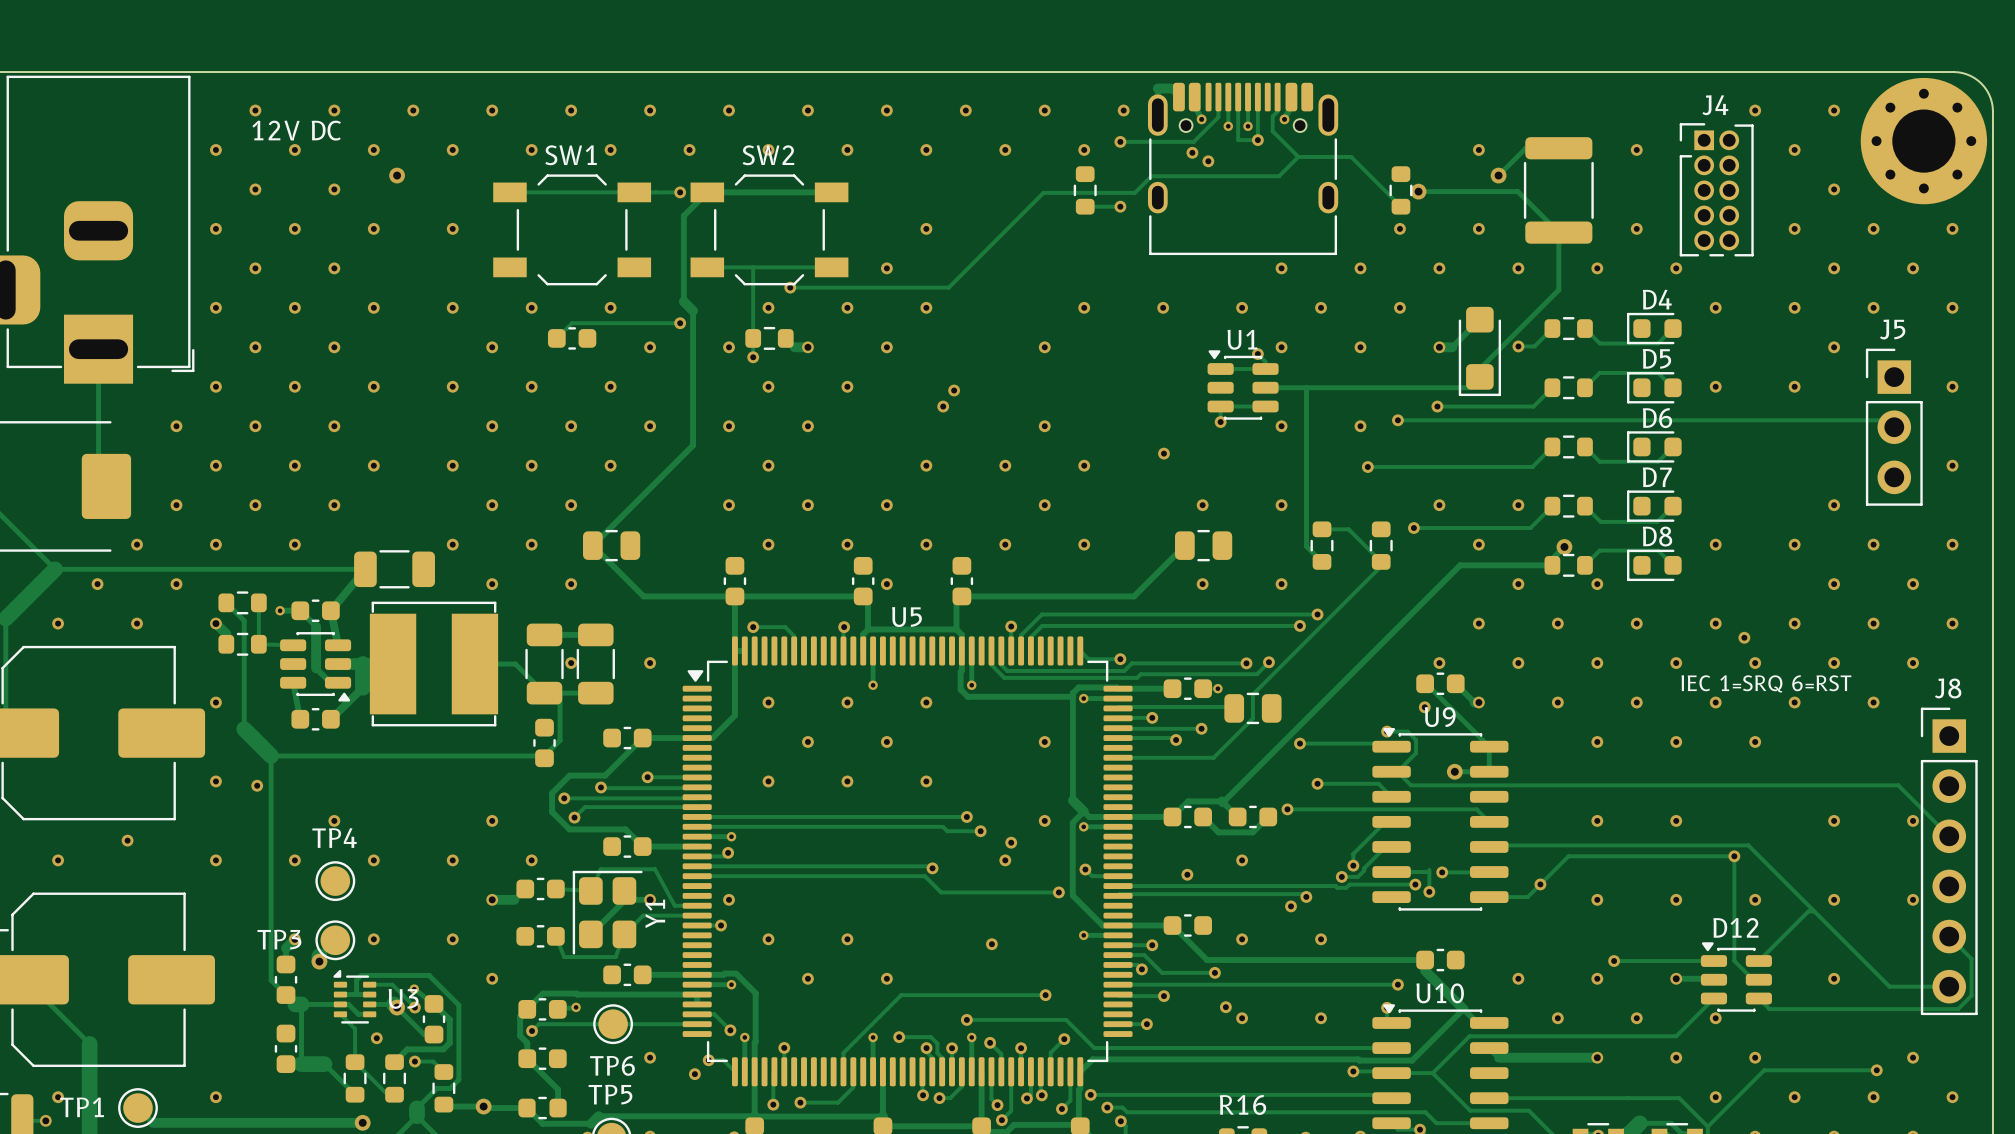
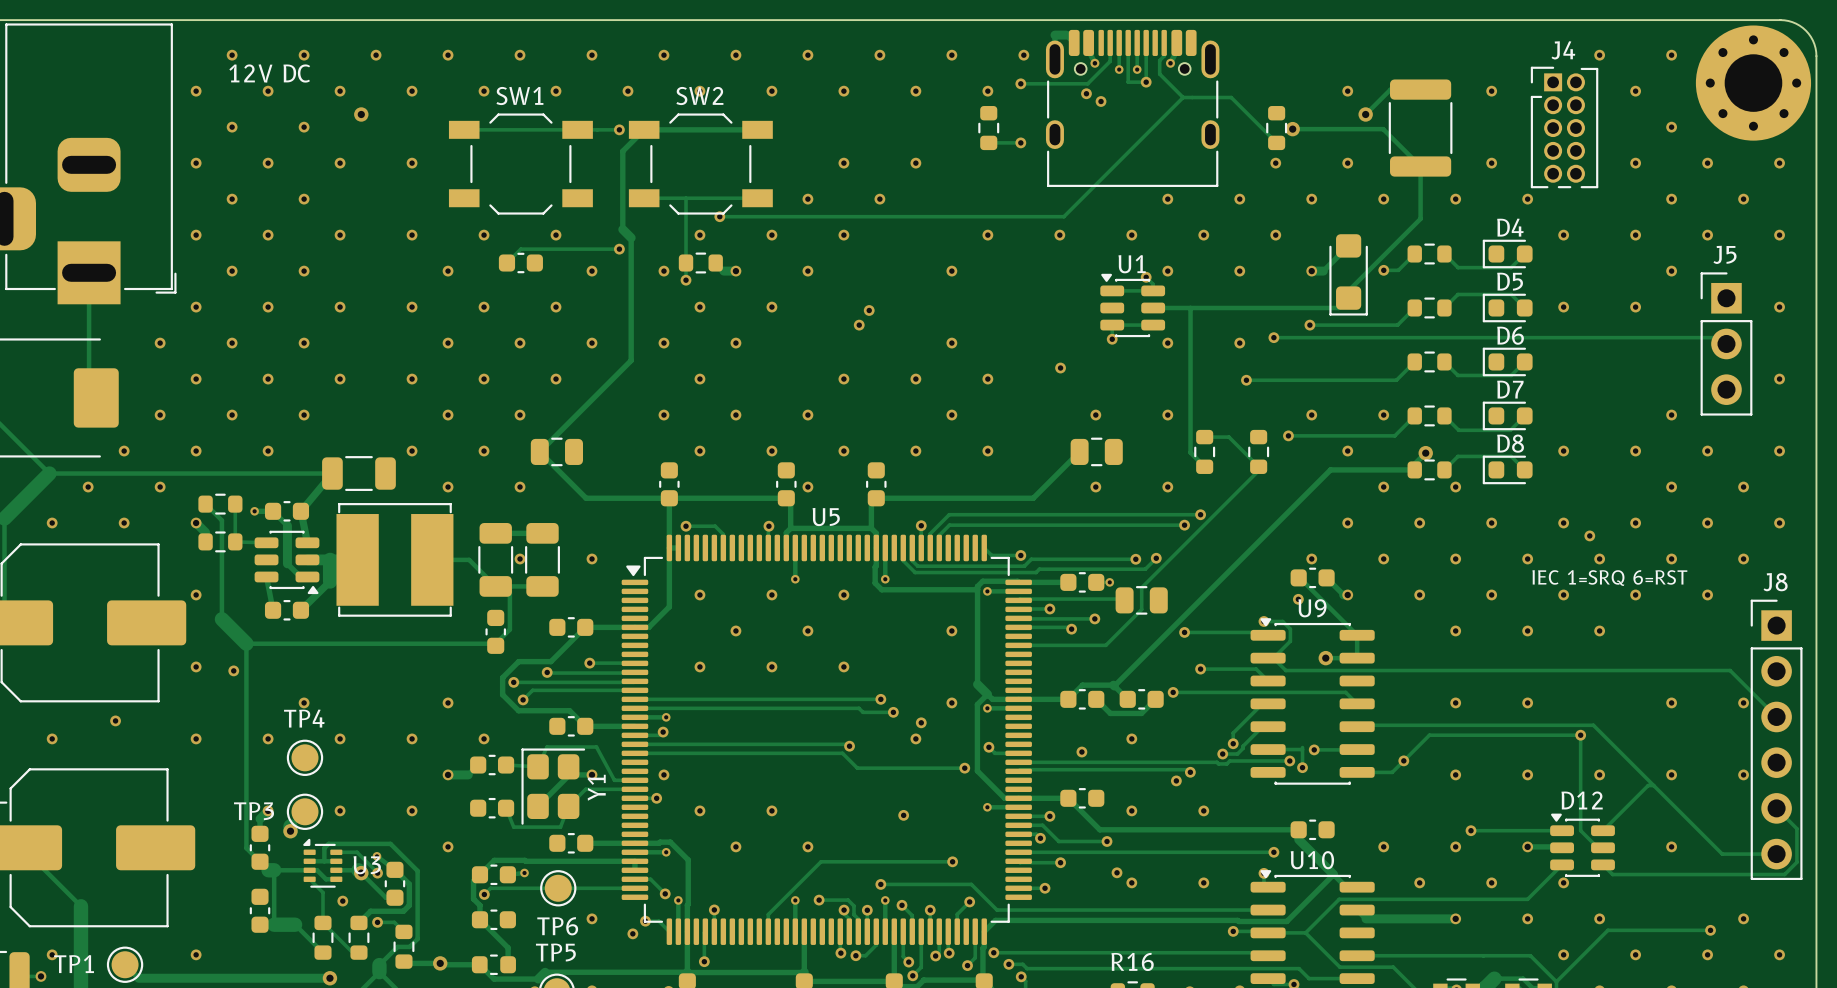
track: (1279, 176) (1151, 176) (1134, 192) (1043, 192) (948, 287) -> (1165, 115) (1063, 216) (864, 216)
via: none -> (915, 163)
via: none -> (879, 199)
track: (853, 1071) (853, 1087) (838, 1102) (800, 1102) -> none
via: (800, 1102) -> none

